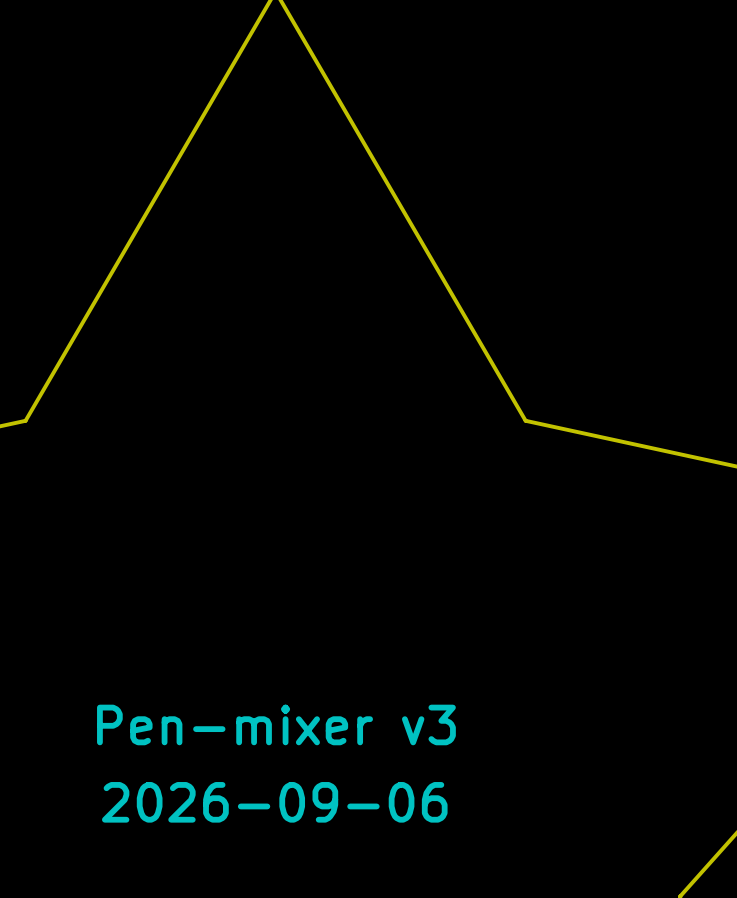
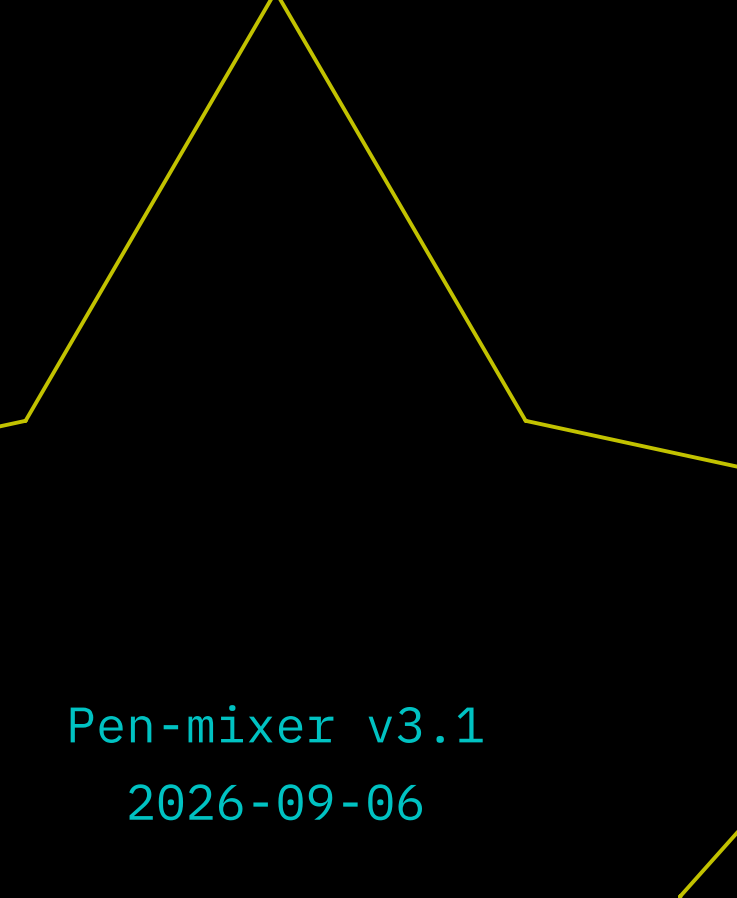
text: Pen-mixer v3 (276, 724) -> Pen-mixer v3.1 (276, 724)

